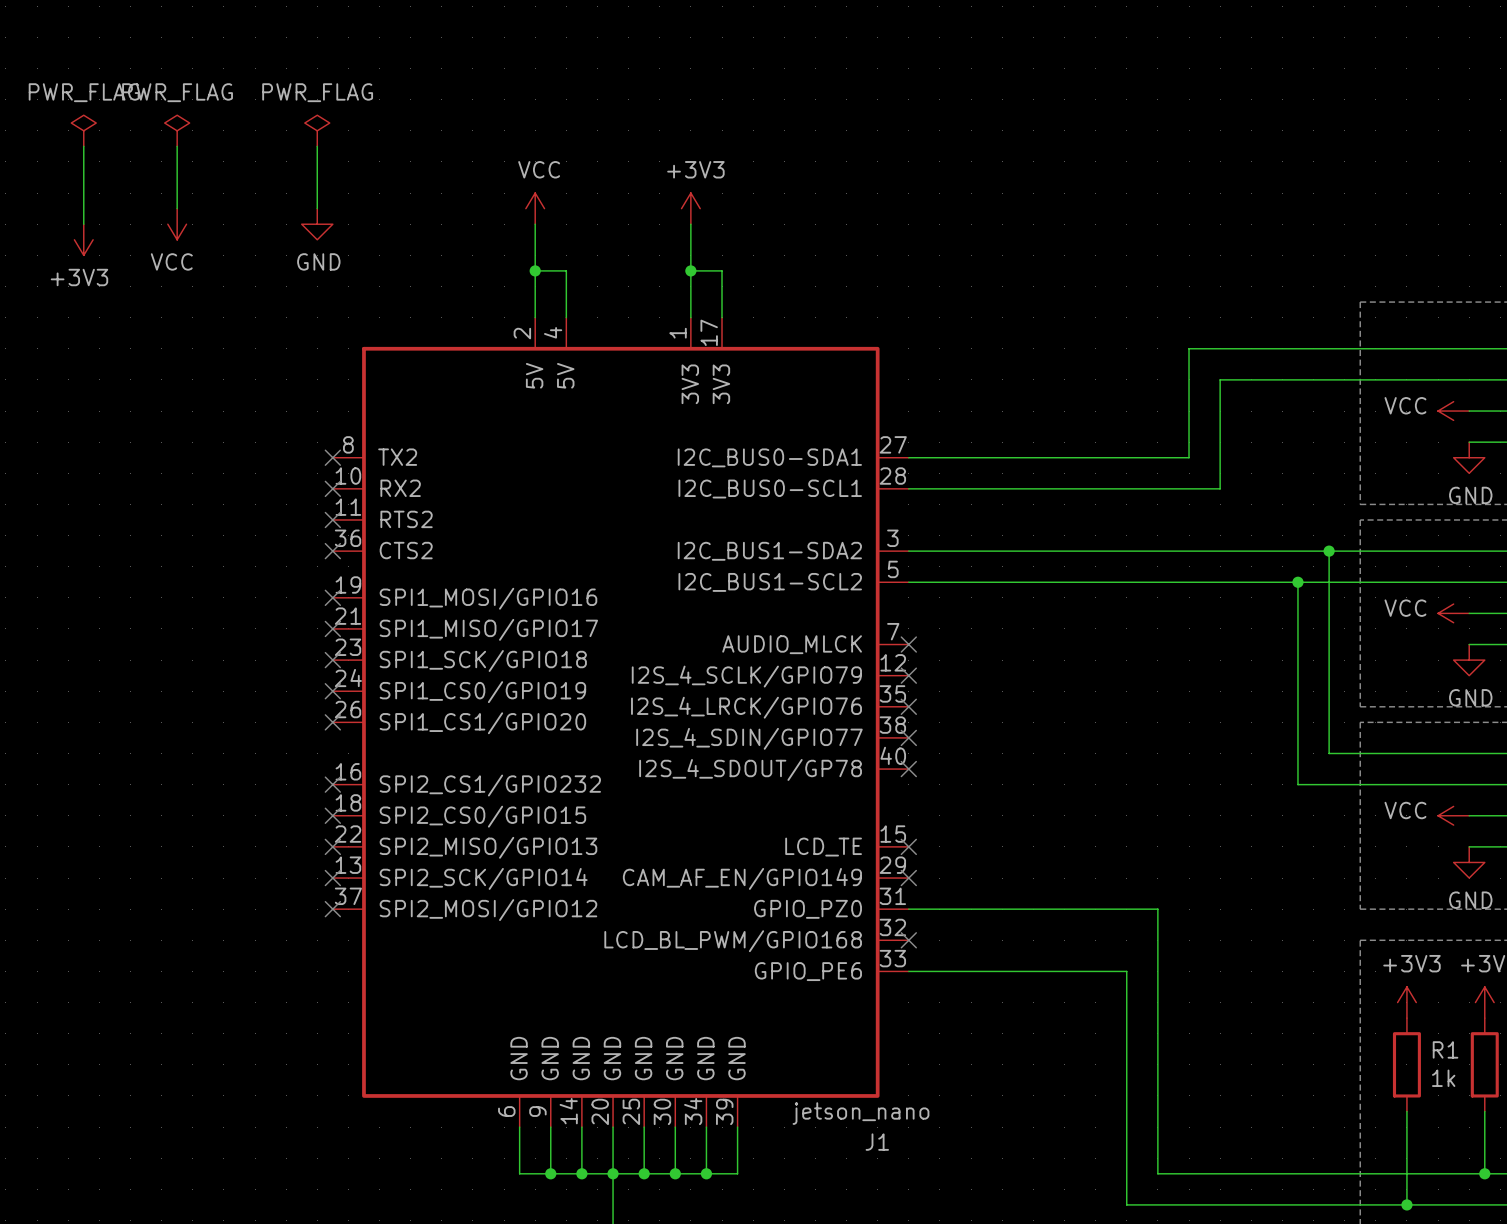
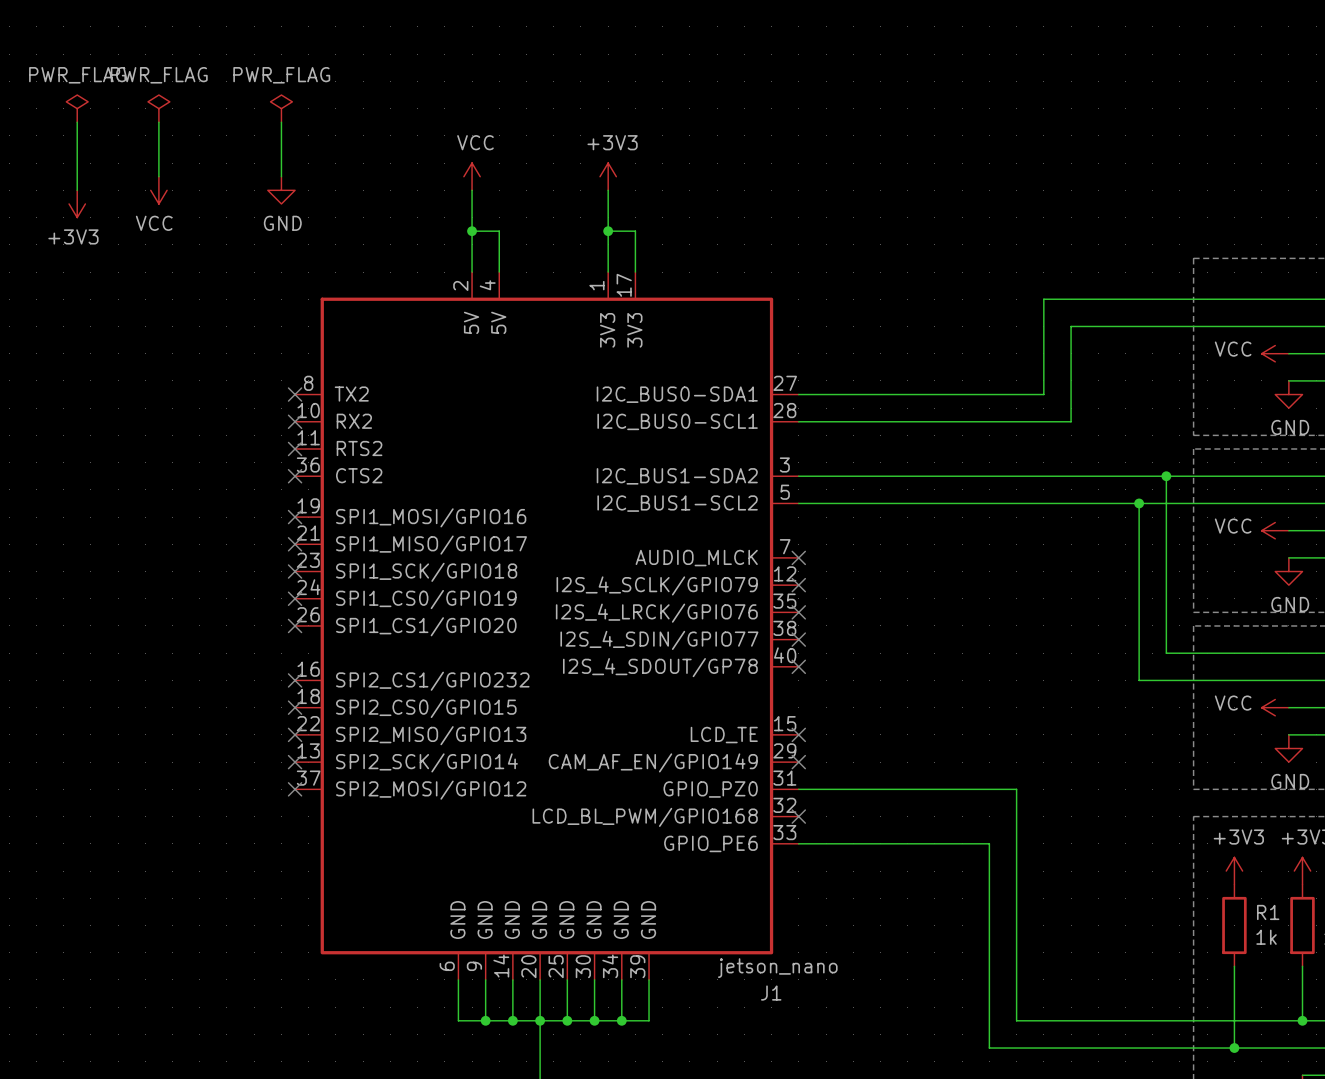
J1 value position: jetson_nano (860, 1113) -> jetson_nano (777, 968)

